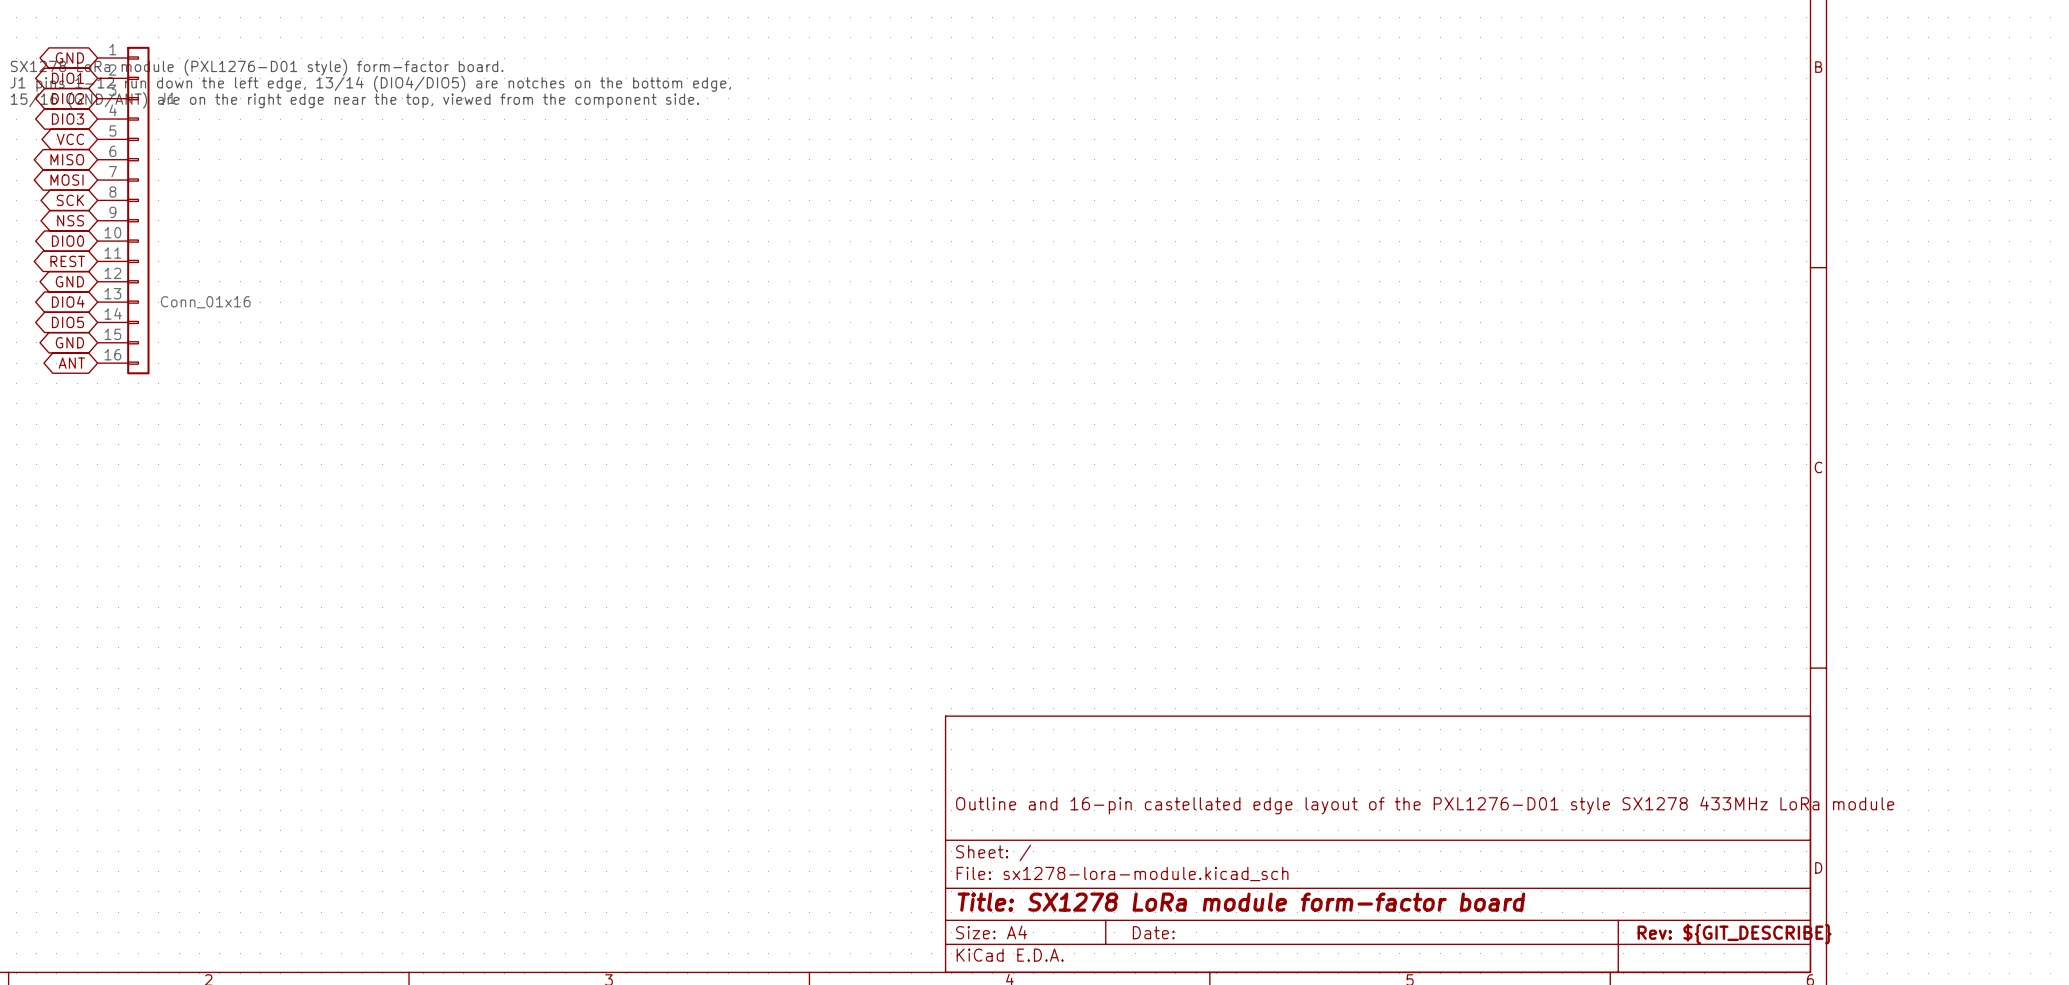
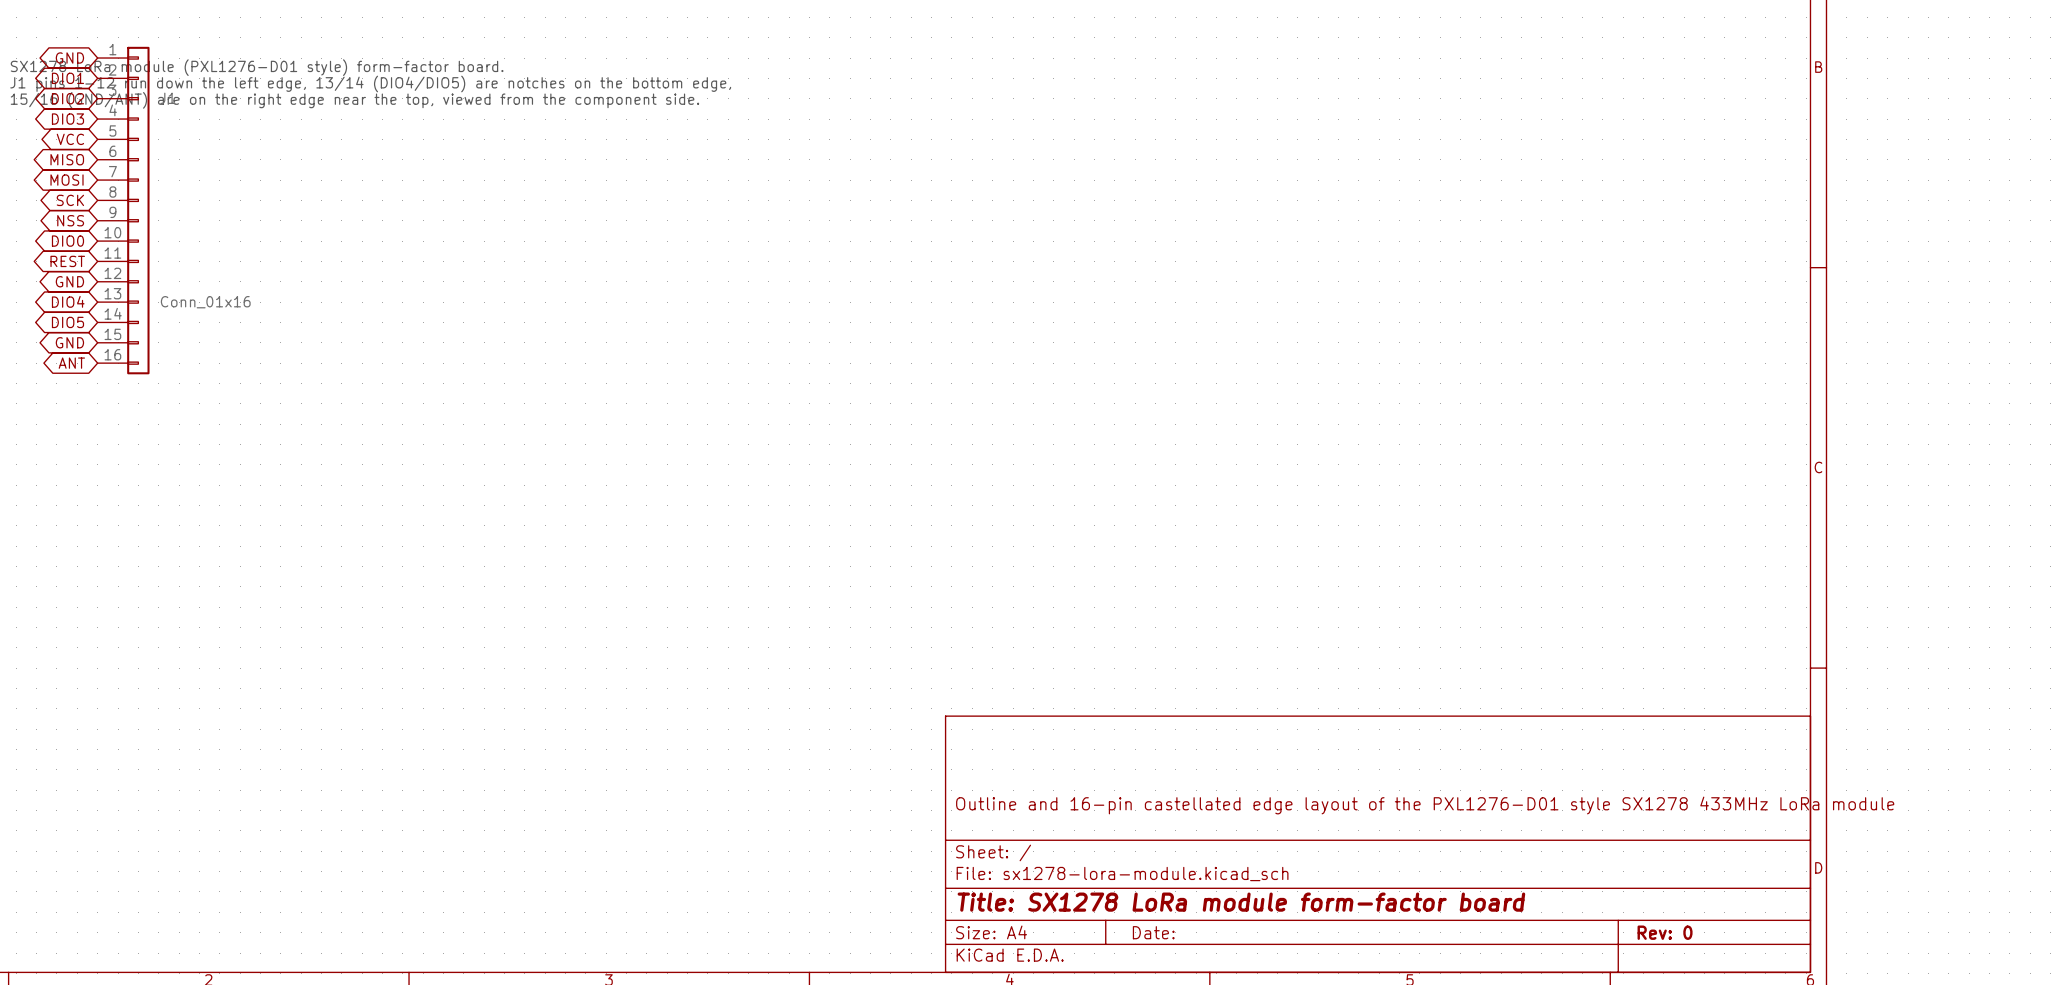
title block: Rev: ${GIT_DESCRIBE} (1734, 934) -> Rev: 0 (1665, 932)

